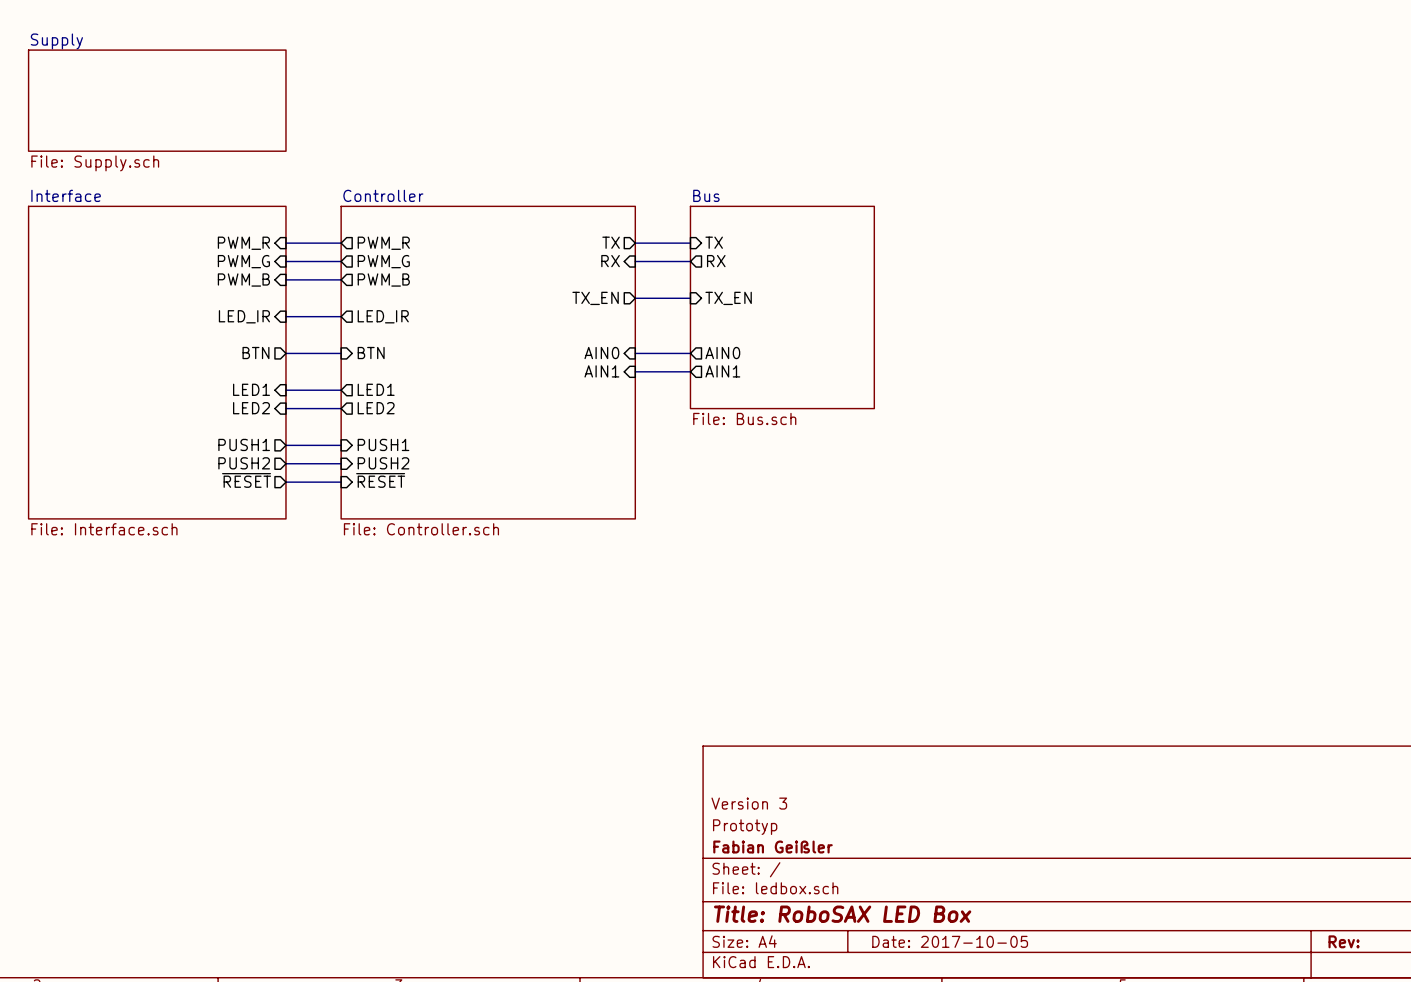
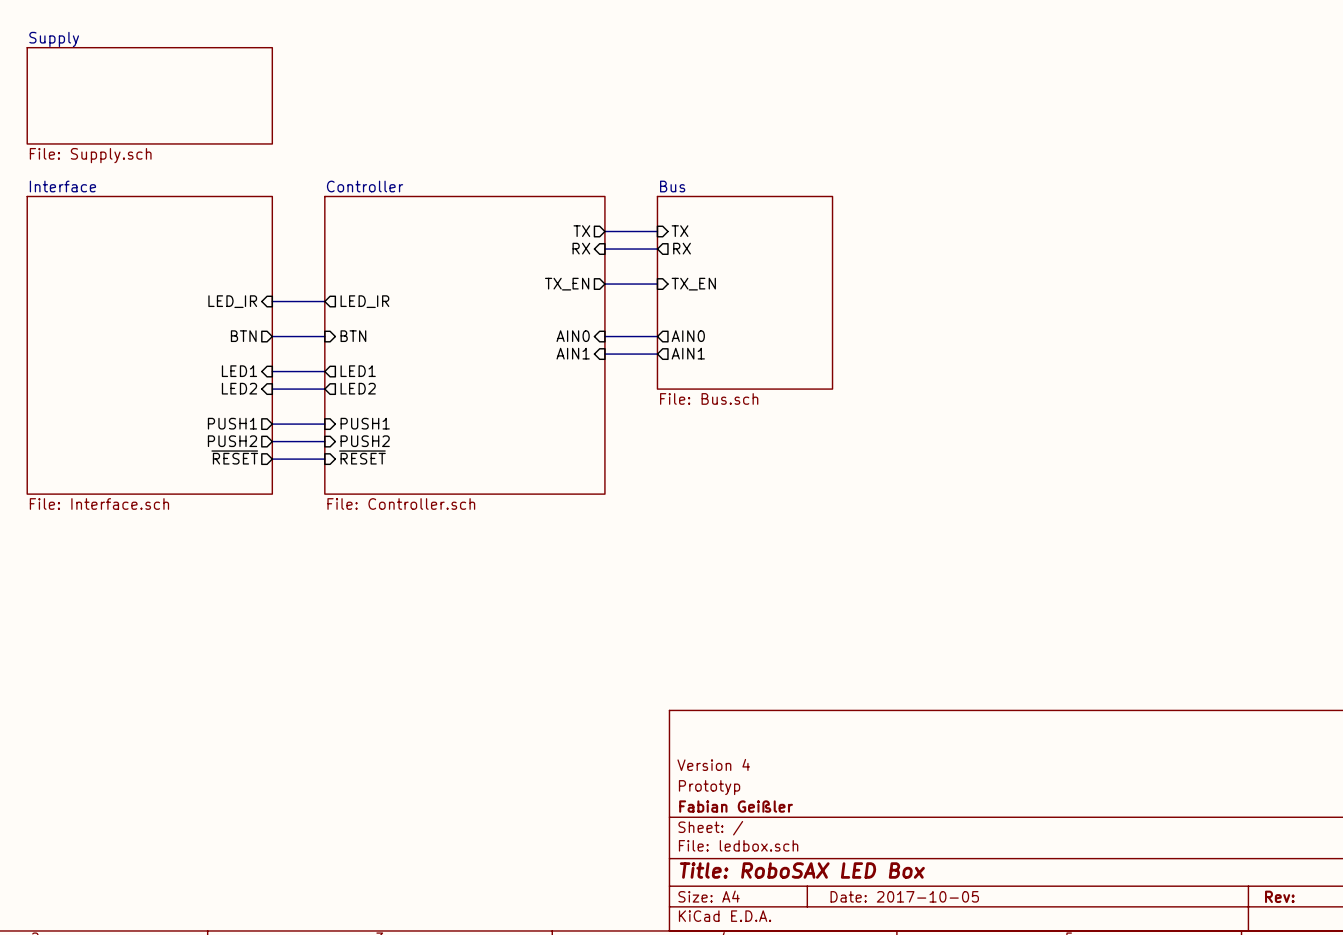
sheet pin: PWM_R (243, 243) -> none
wire: (285, 243) (341, 243) -> none
sheet pin: PWM_R (383, 243) -> none
sheet pin: PWM_G (243, 261) -> none
wire: (285, 261) (341, 261) -> none
sheet pin: PWM_G (383, 261) -> none
wire: (285, 279) (341, 279) -> none
sheet pin: PWM_B (243, 280) -> none
sheet pin: PWM_B (383, 280) -> none
title block: Version 3 (749, 803) -> Version 4 (713, 764)

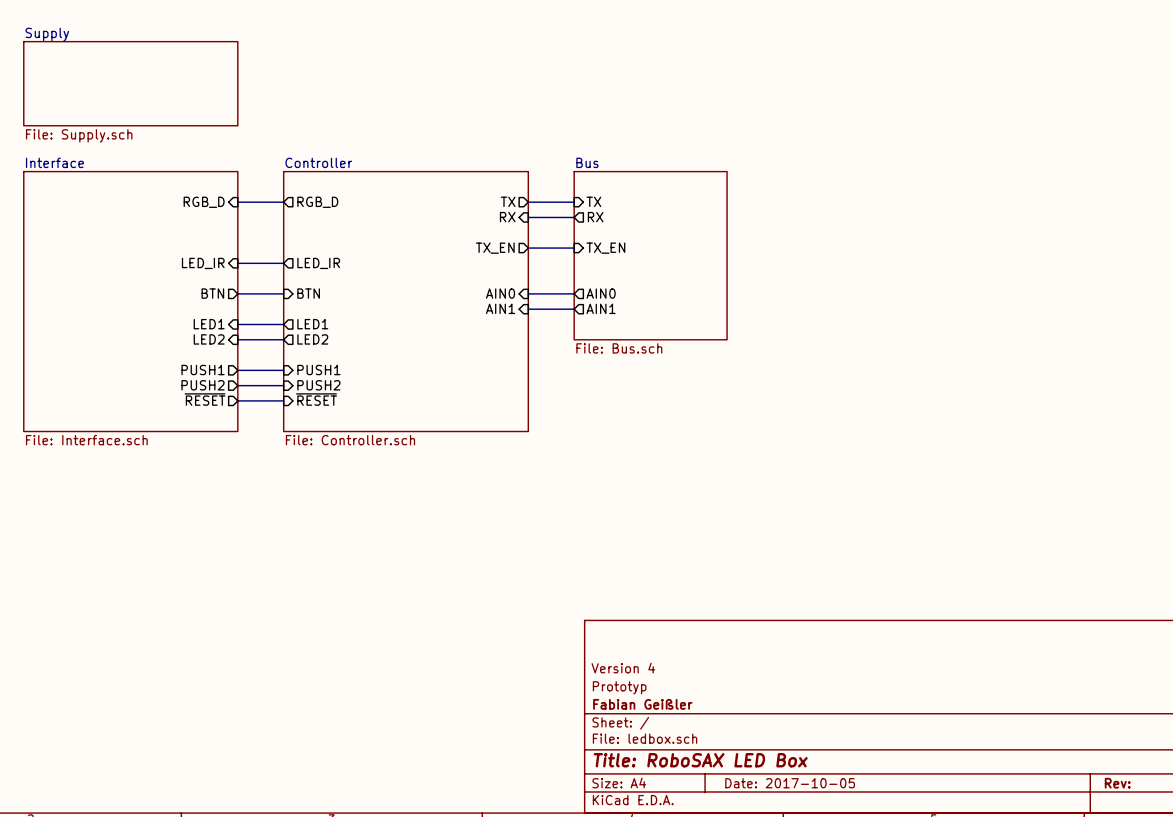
sheet pin: none -> RGB_D (204, 202)
wire: none -> (237, 202) (283, 202)
sheet pin: none -> RGB_D (317, 202)

